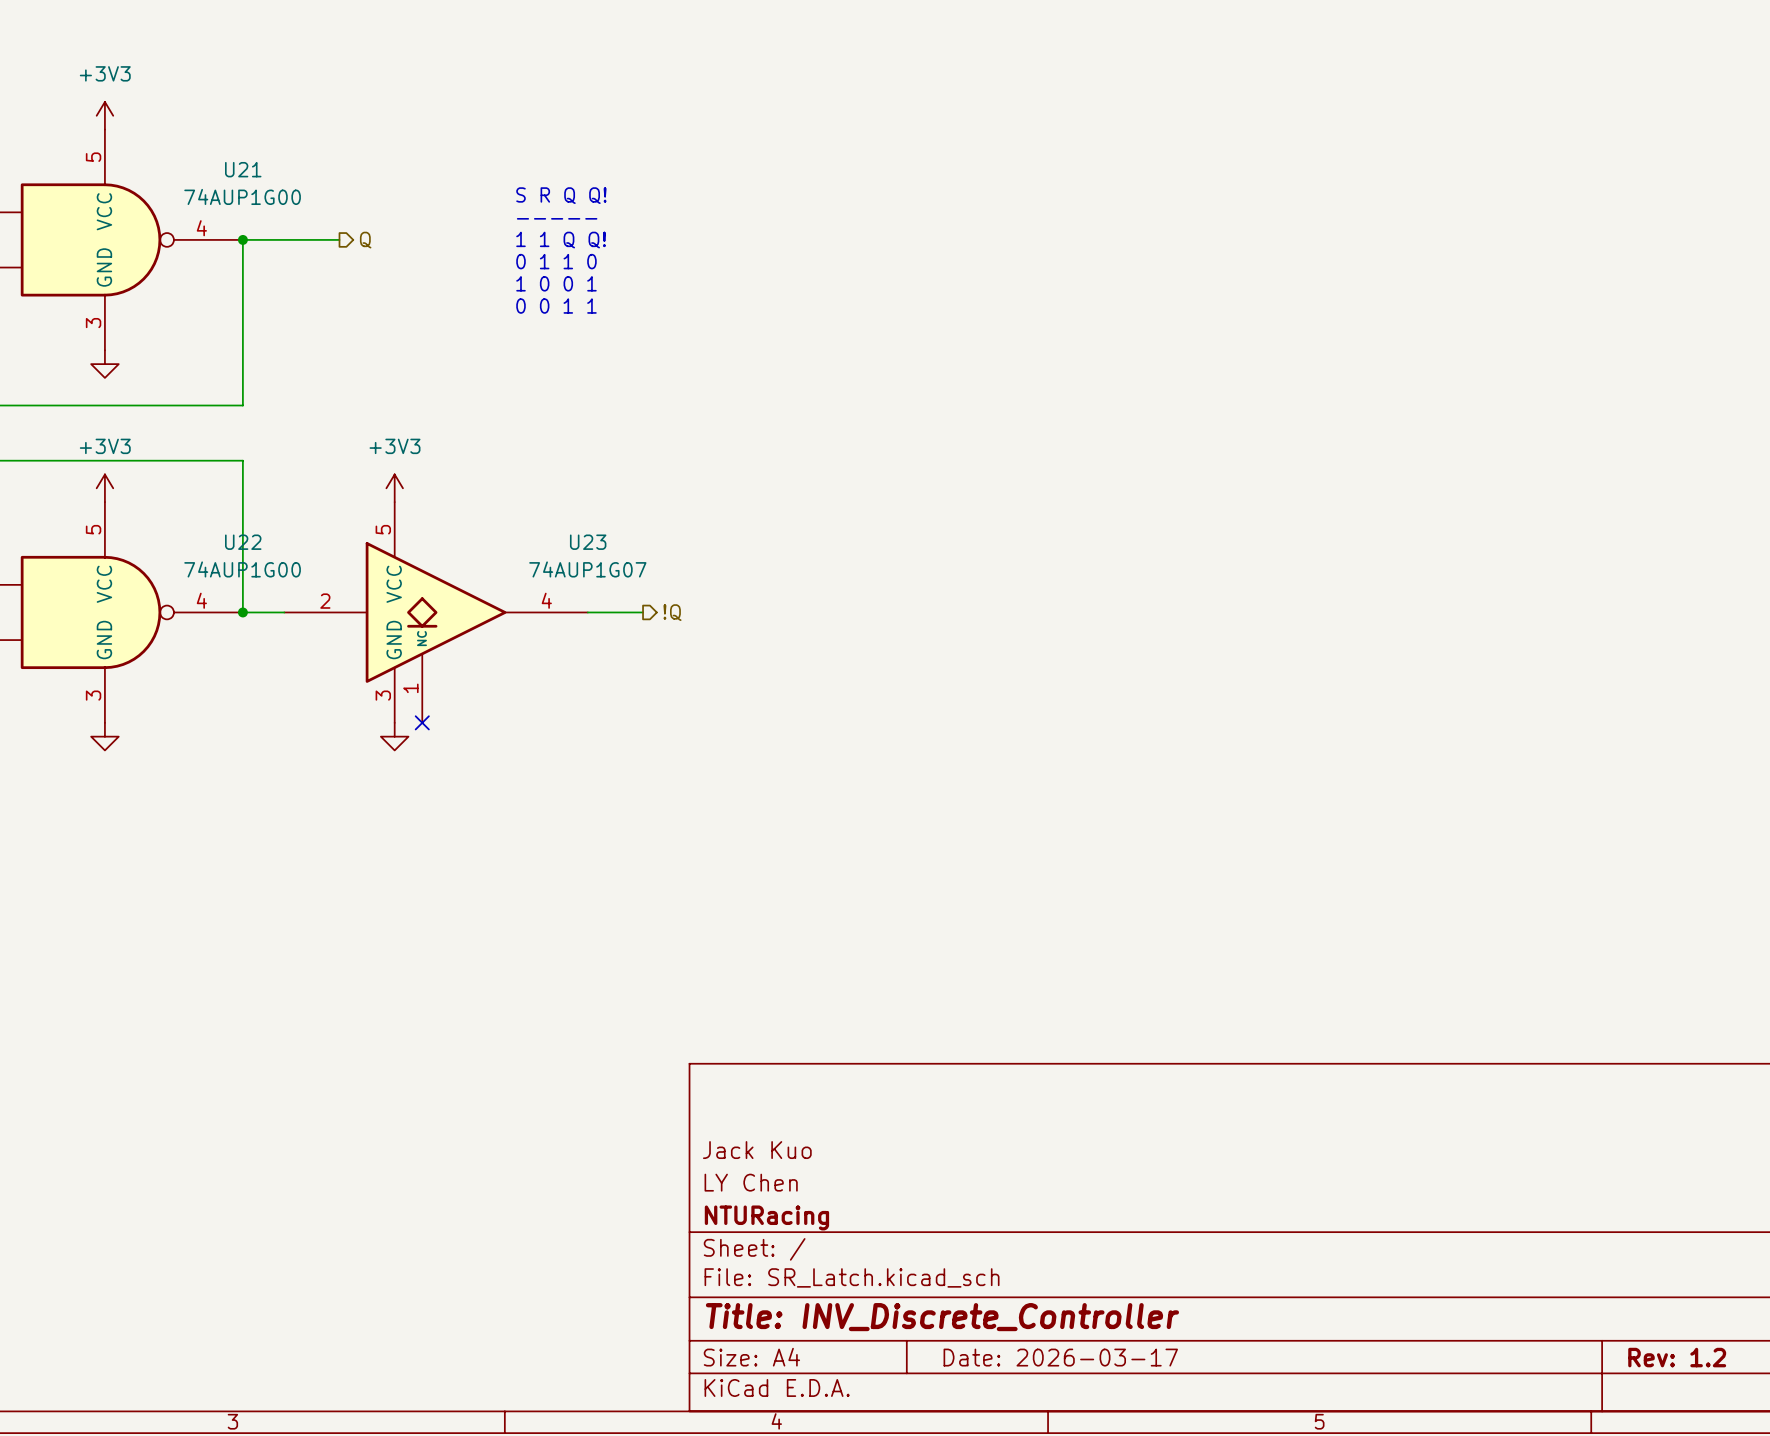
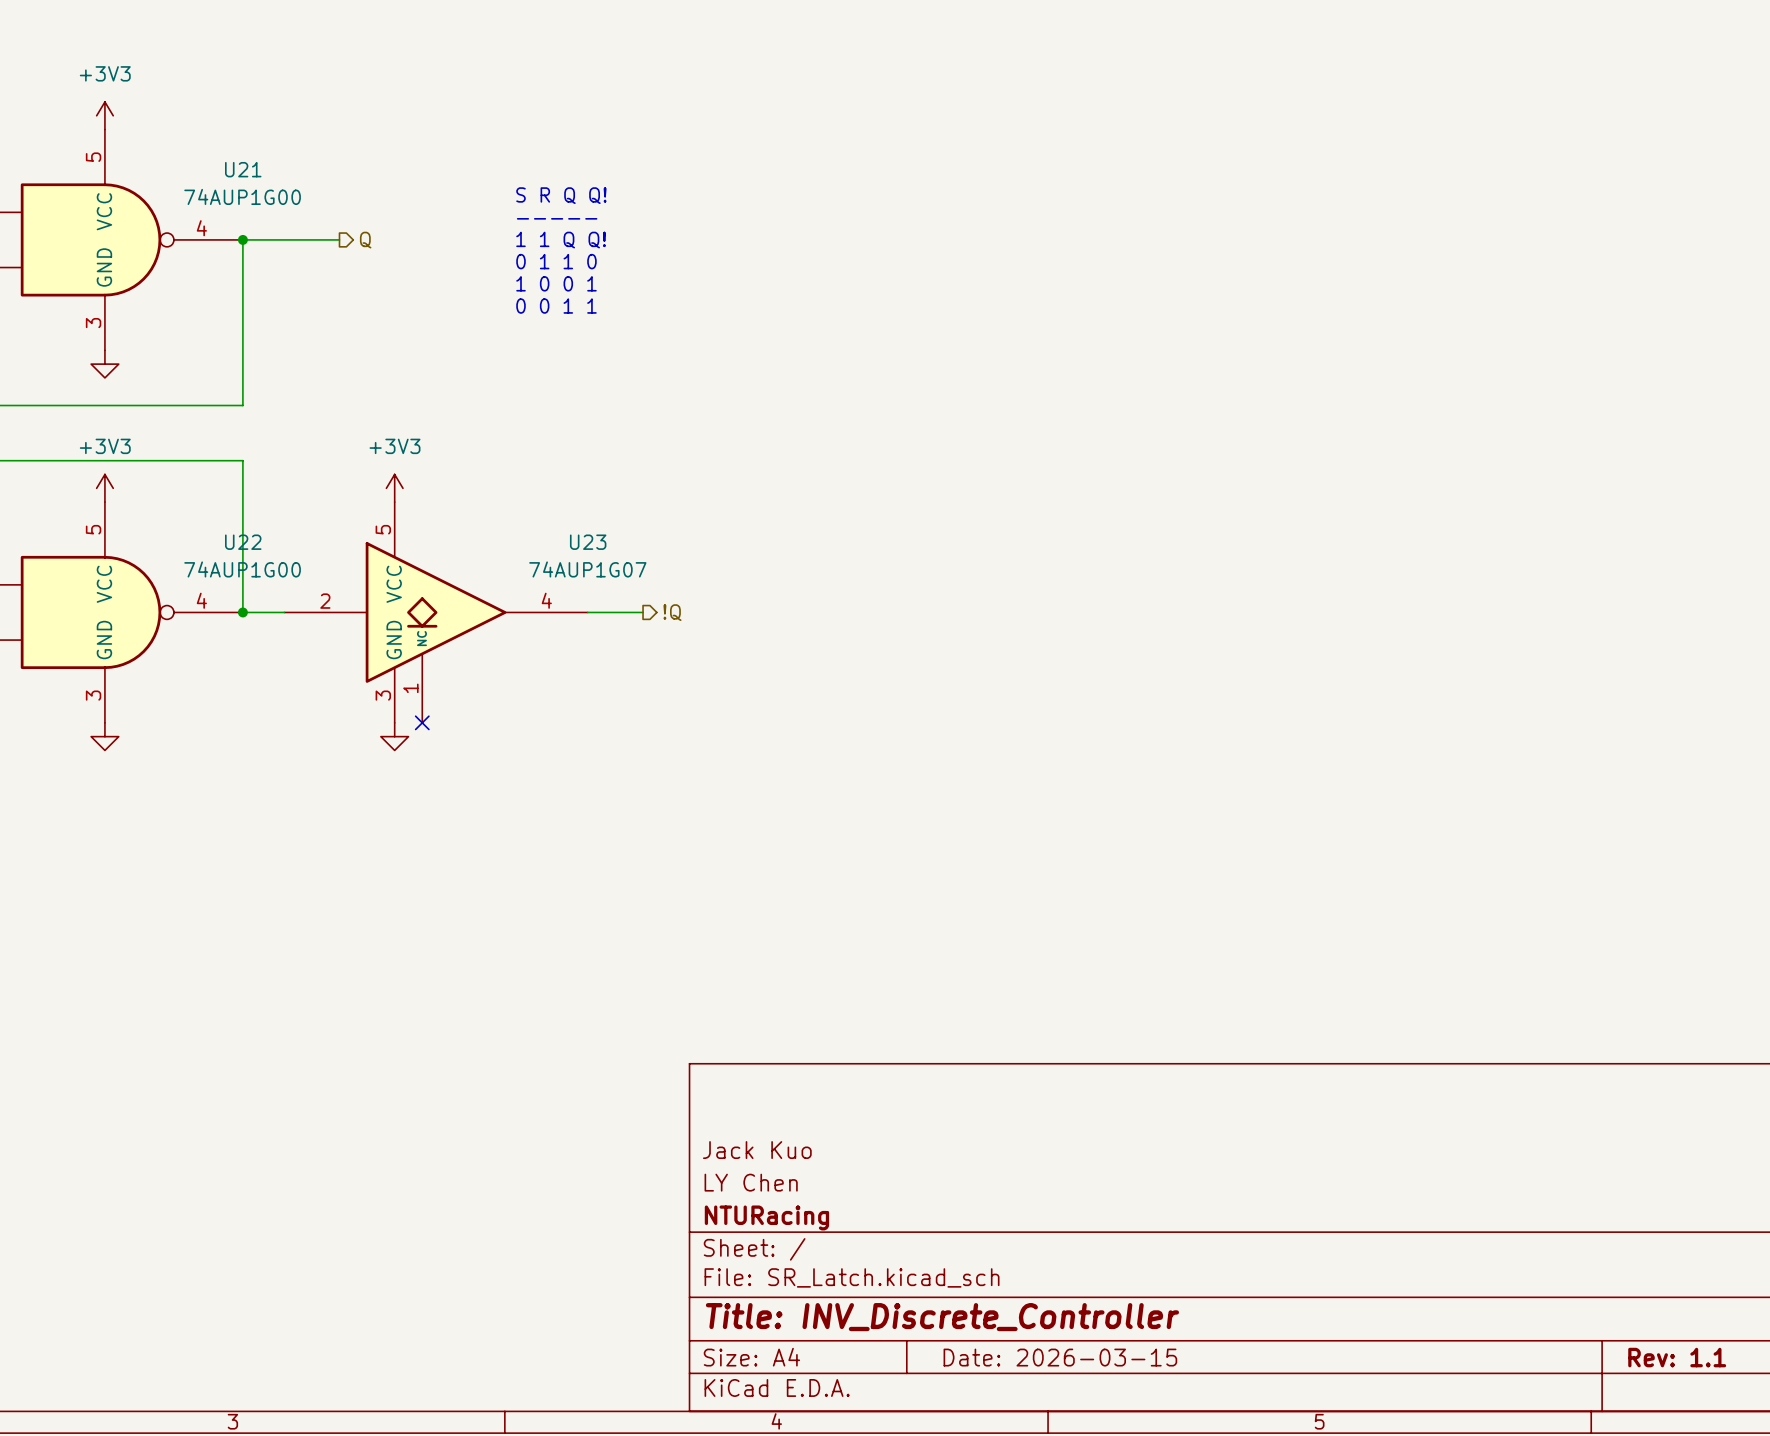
title block: Date: 2026-03-17 (1060, 1357) -> Date: 2026-03-15 (1060, 1357)
title block: Rev: 1.2 (1677, 1357) -> Rev: 1.1 (1677, 1357)

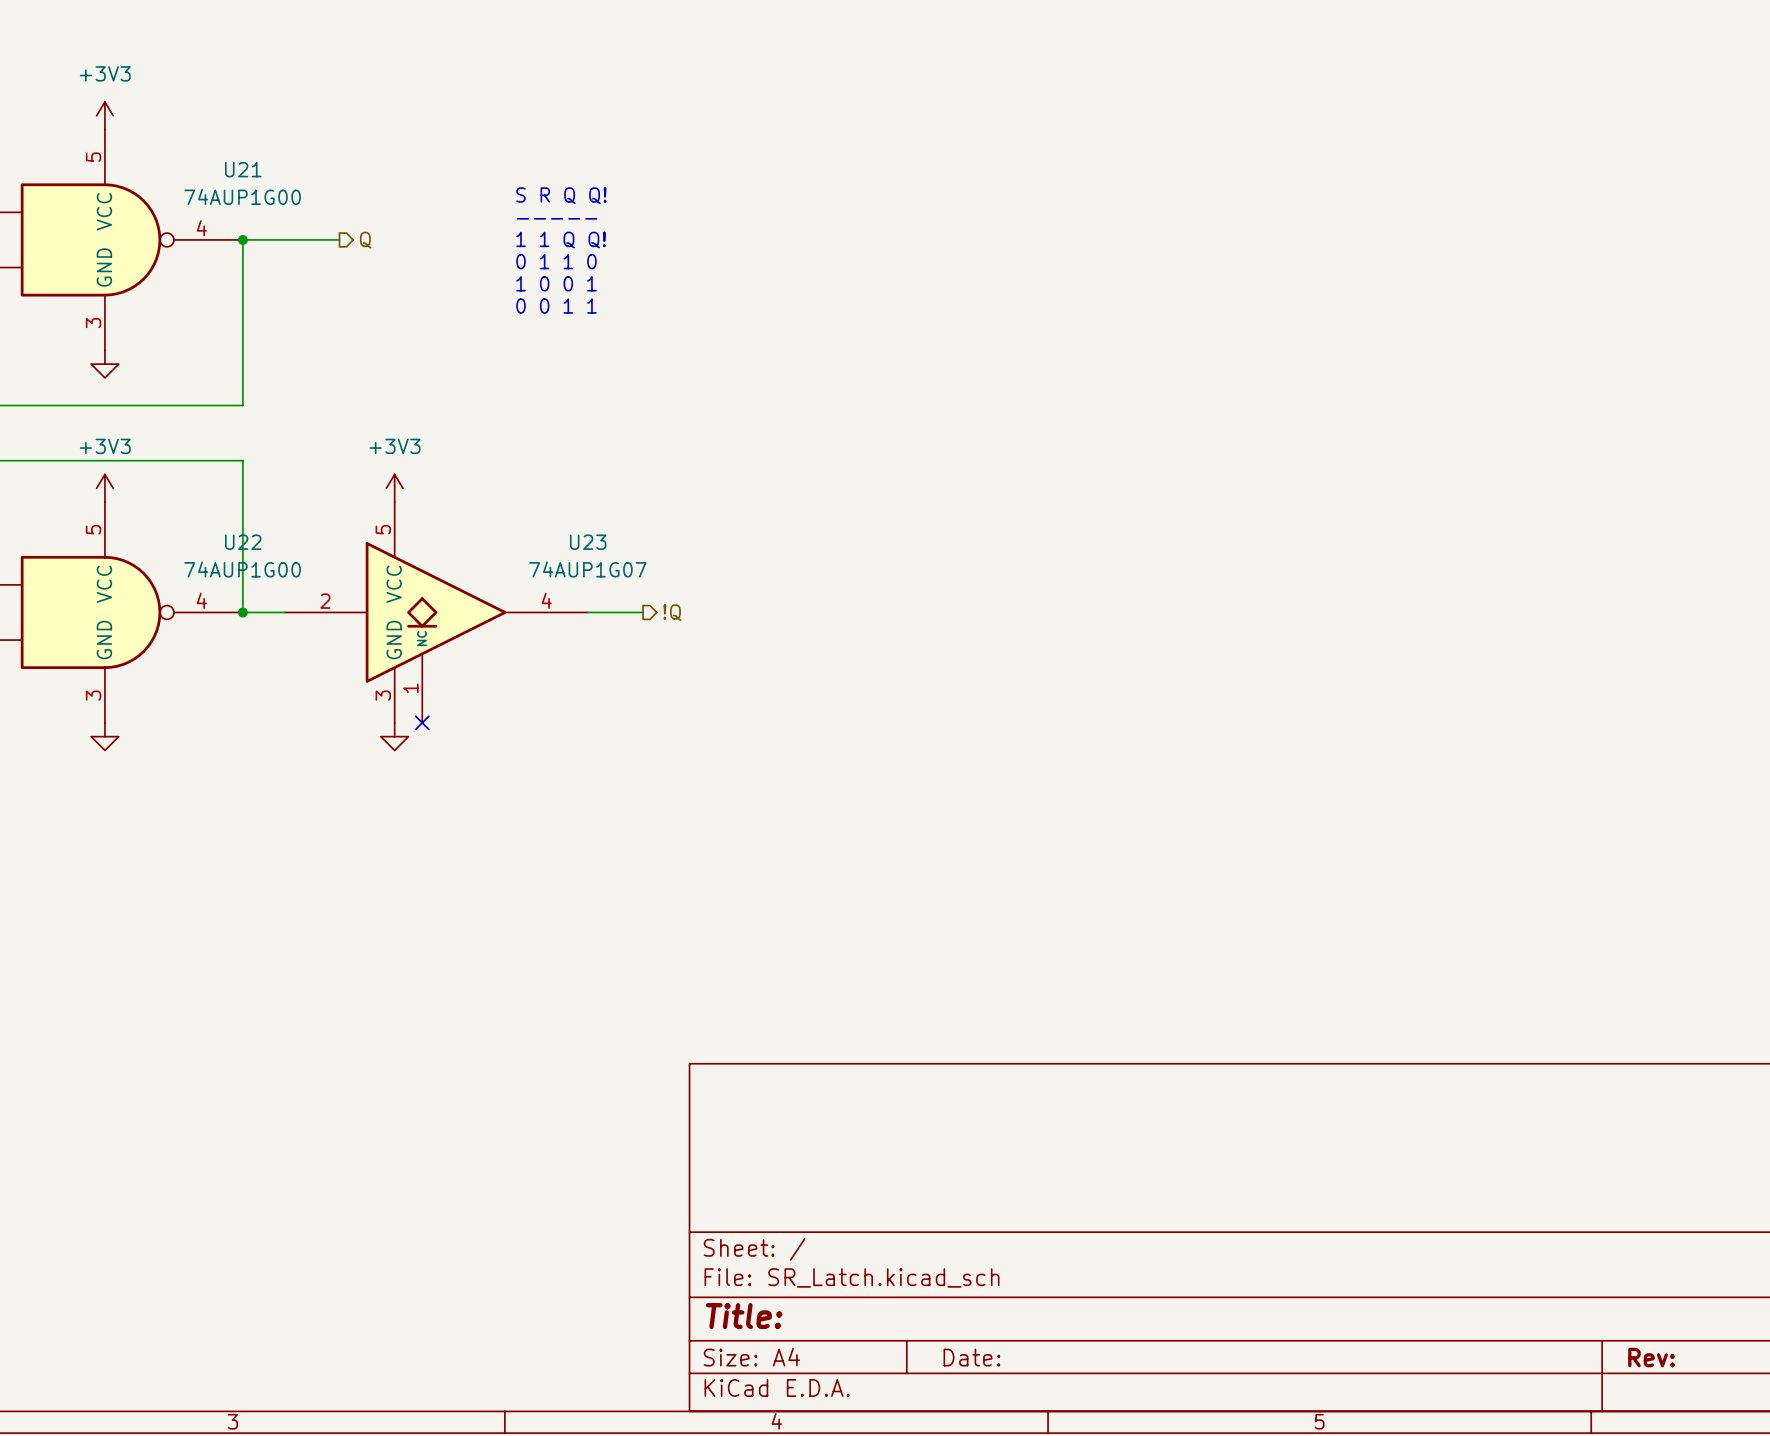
title block: Jack Kuo (757, 1150) -> none
title block: LY Chen (751, 1182) -> none
title block: NTURacing (766, 1217) -> none
title block: Title: INV_Discrete_Controller (942, 1317) -> Title: (744, 1316)
title block: Date: 2026-03-15 (1060, 1357) -> Date: (971, 1357)
title block: Rev: 1.1 (1677, 1357) -> Rev: (1651, 1357)

